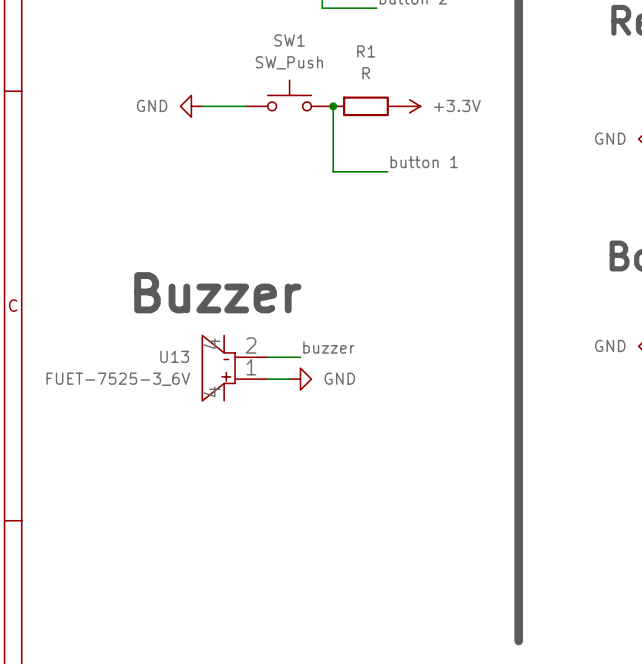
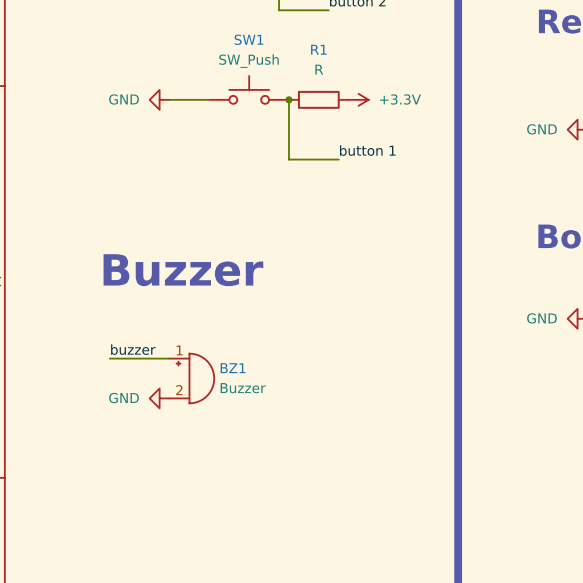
label position: buzzer (328, 347) -> buzzer (133, 349)
wire: (267, 357) (300, 357) -> none
U13: FUET-7525-3_6V (235, 368) -> none
wire: (267, 379) (289, 379) -> none
power symbol rotation: 0° (300, 379) -> 180° (159, 398)
power symbol position: GND (300, 379) -> GND (159, 398)
wire: none -> (109, 358) (169, 358)
BZ1: none -> Buzzer (191, 378)

